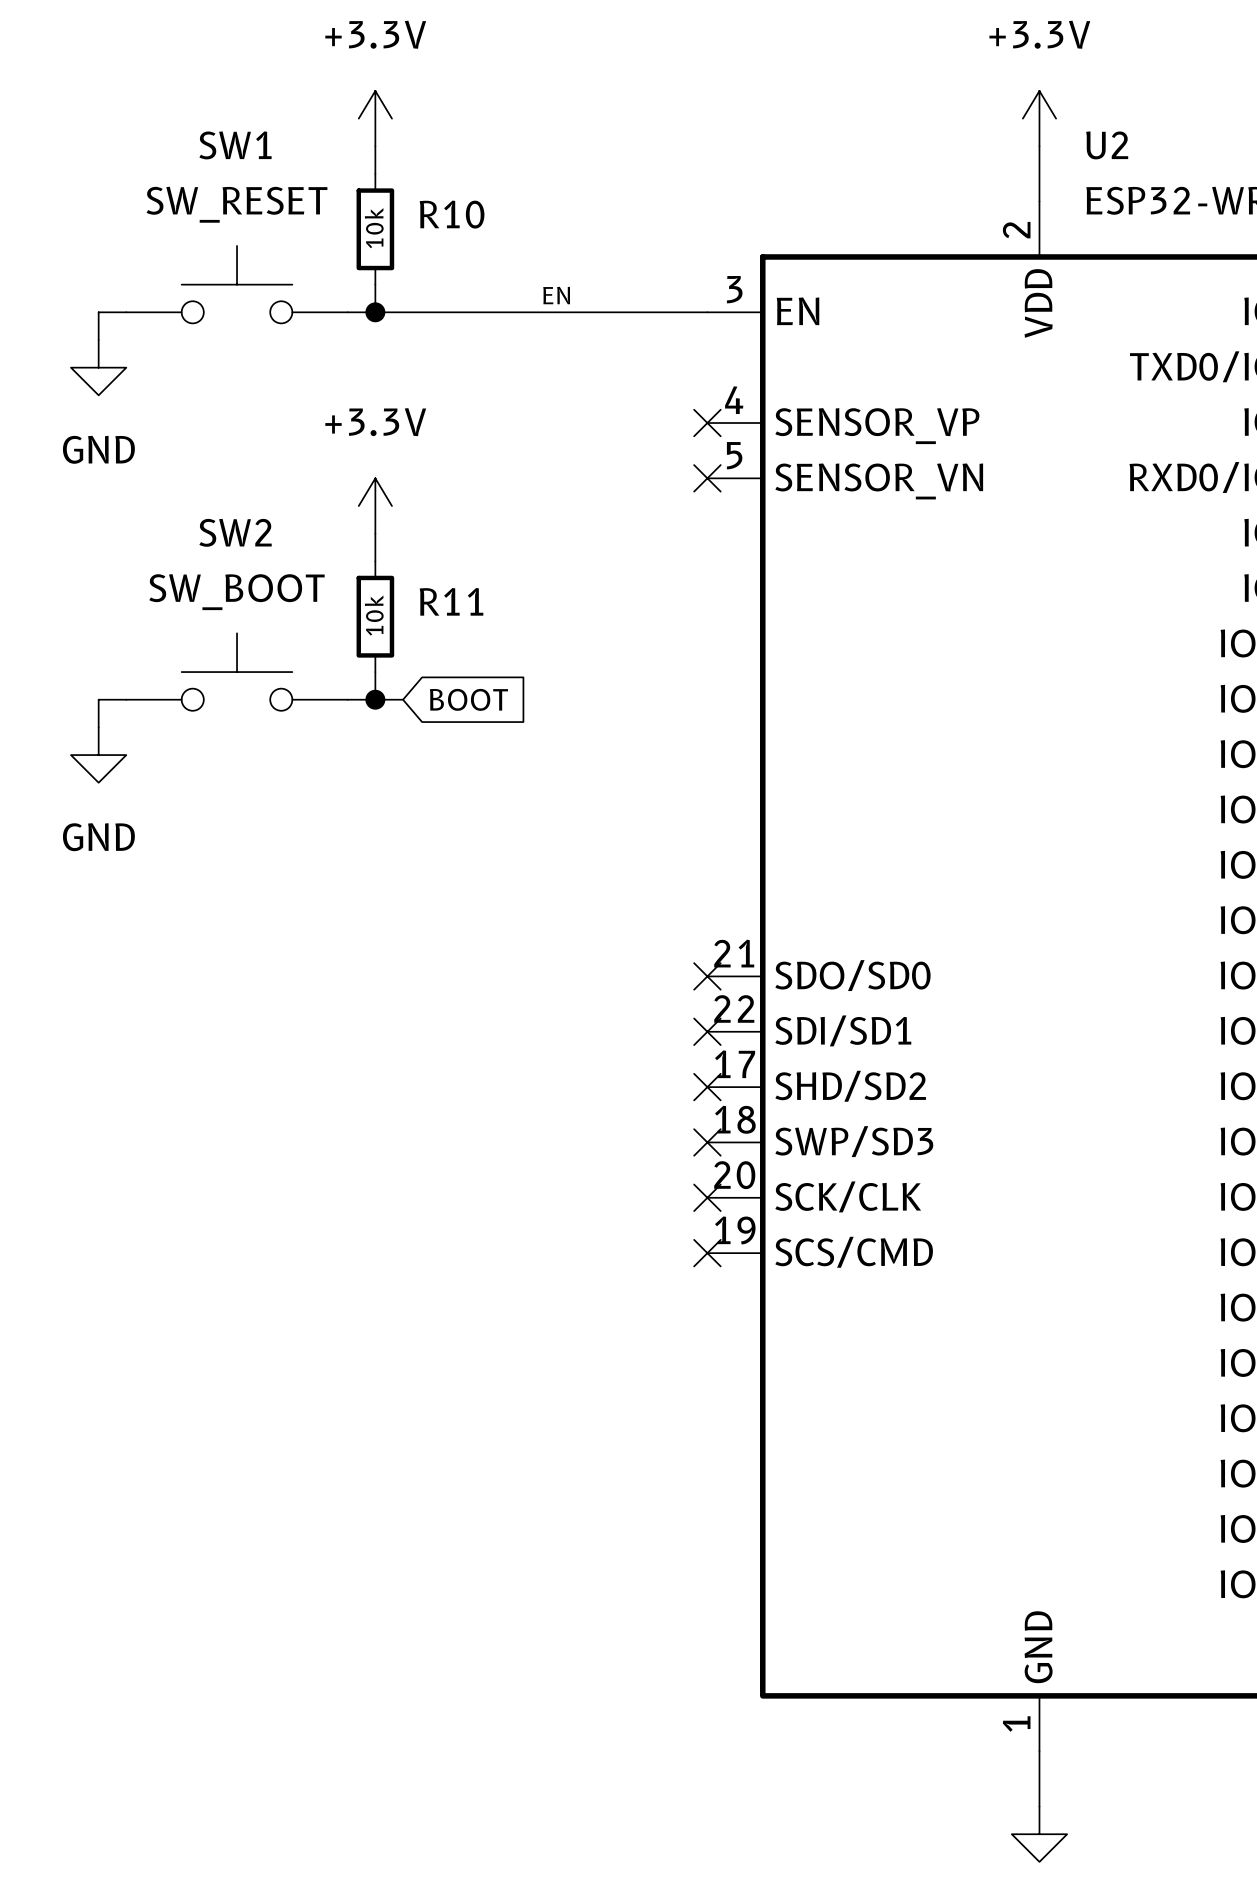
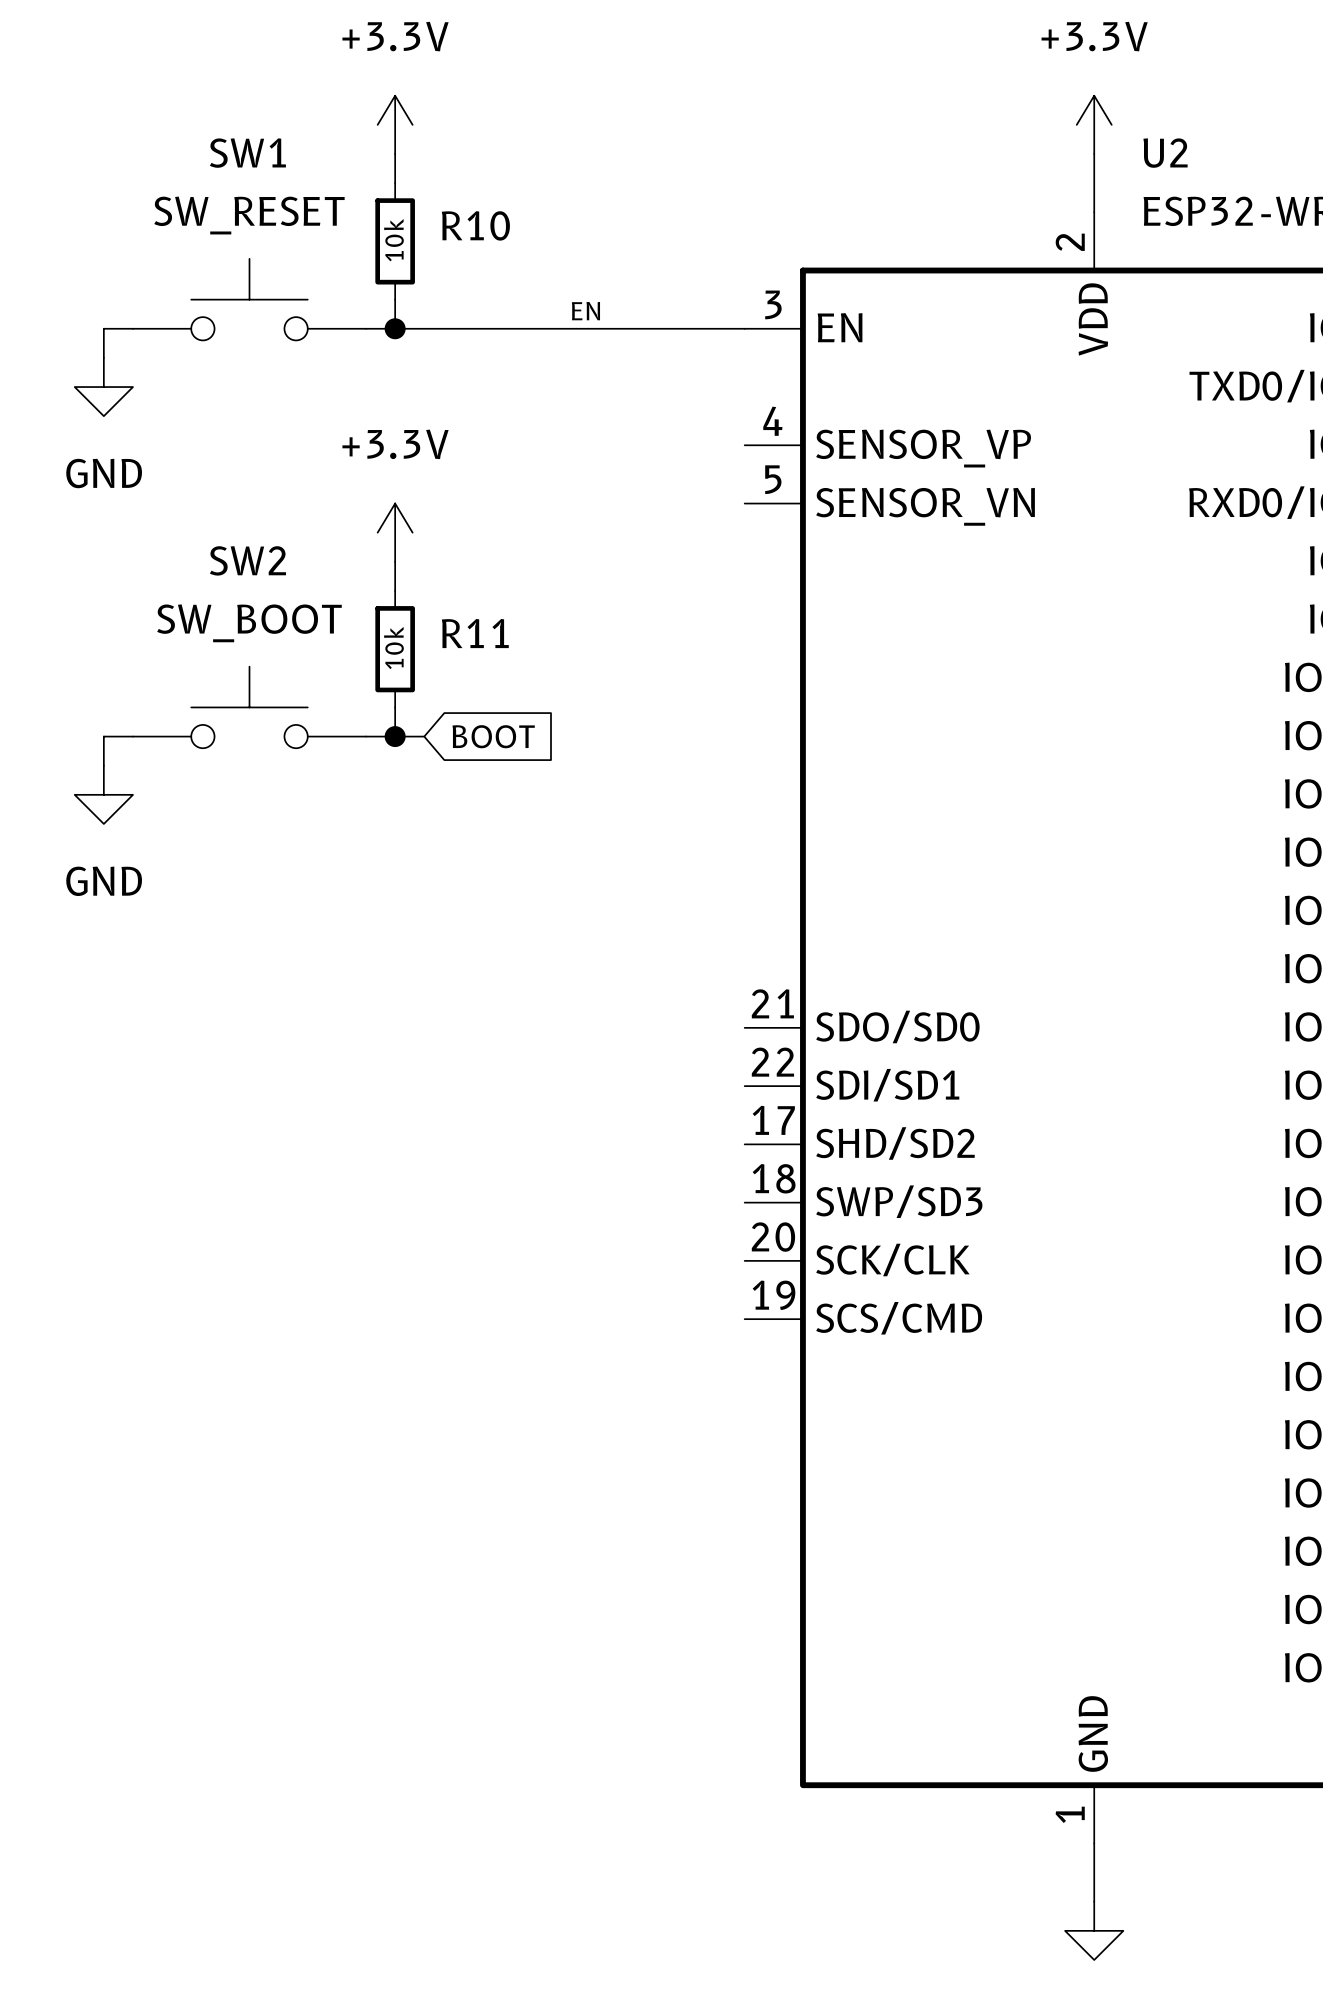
no-connect mark: (707, 423) -> none
no-connect mark: (707, 478) -> none
no-connect mark: (707, 976) -> none
no-connect mark: (707, 1031) -> none
no-connect mark: (707, 1087) -> none
no-connect mark: (707, 1142) -> none
no-connect mark: (707, 1197) -> none
no-connect mark: (707, 1253) -> none

